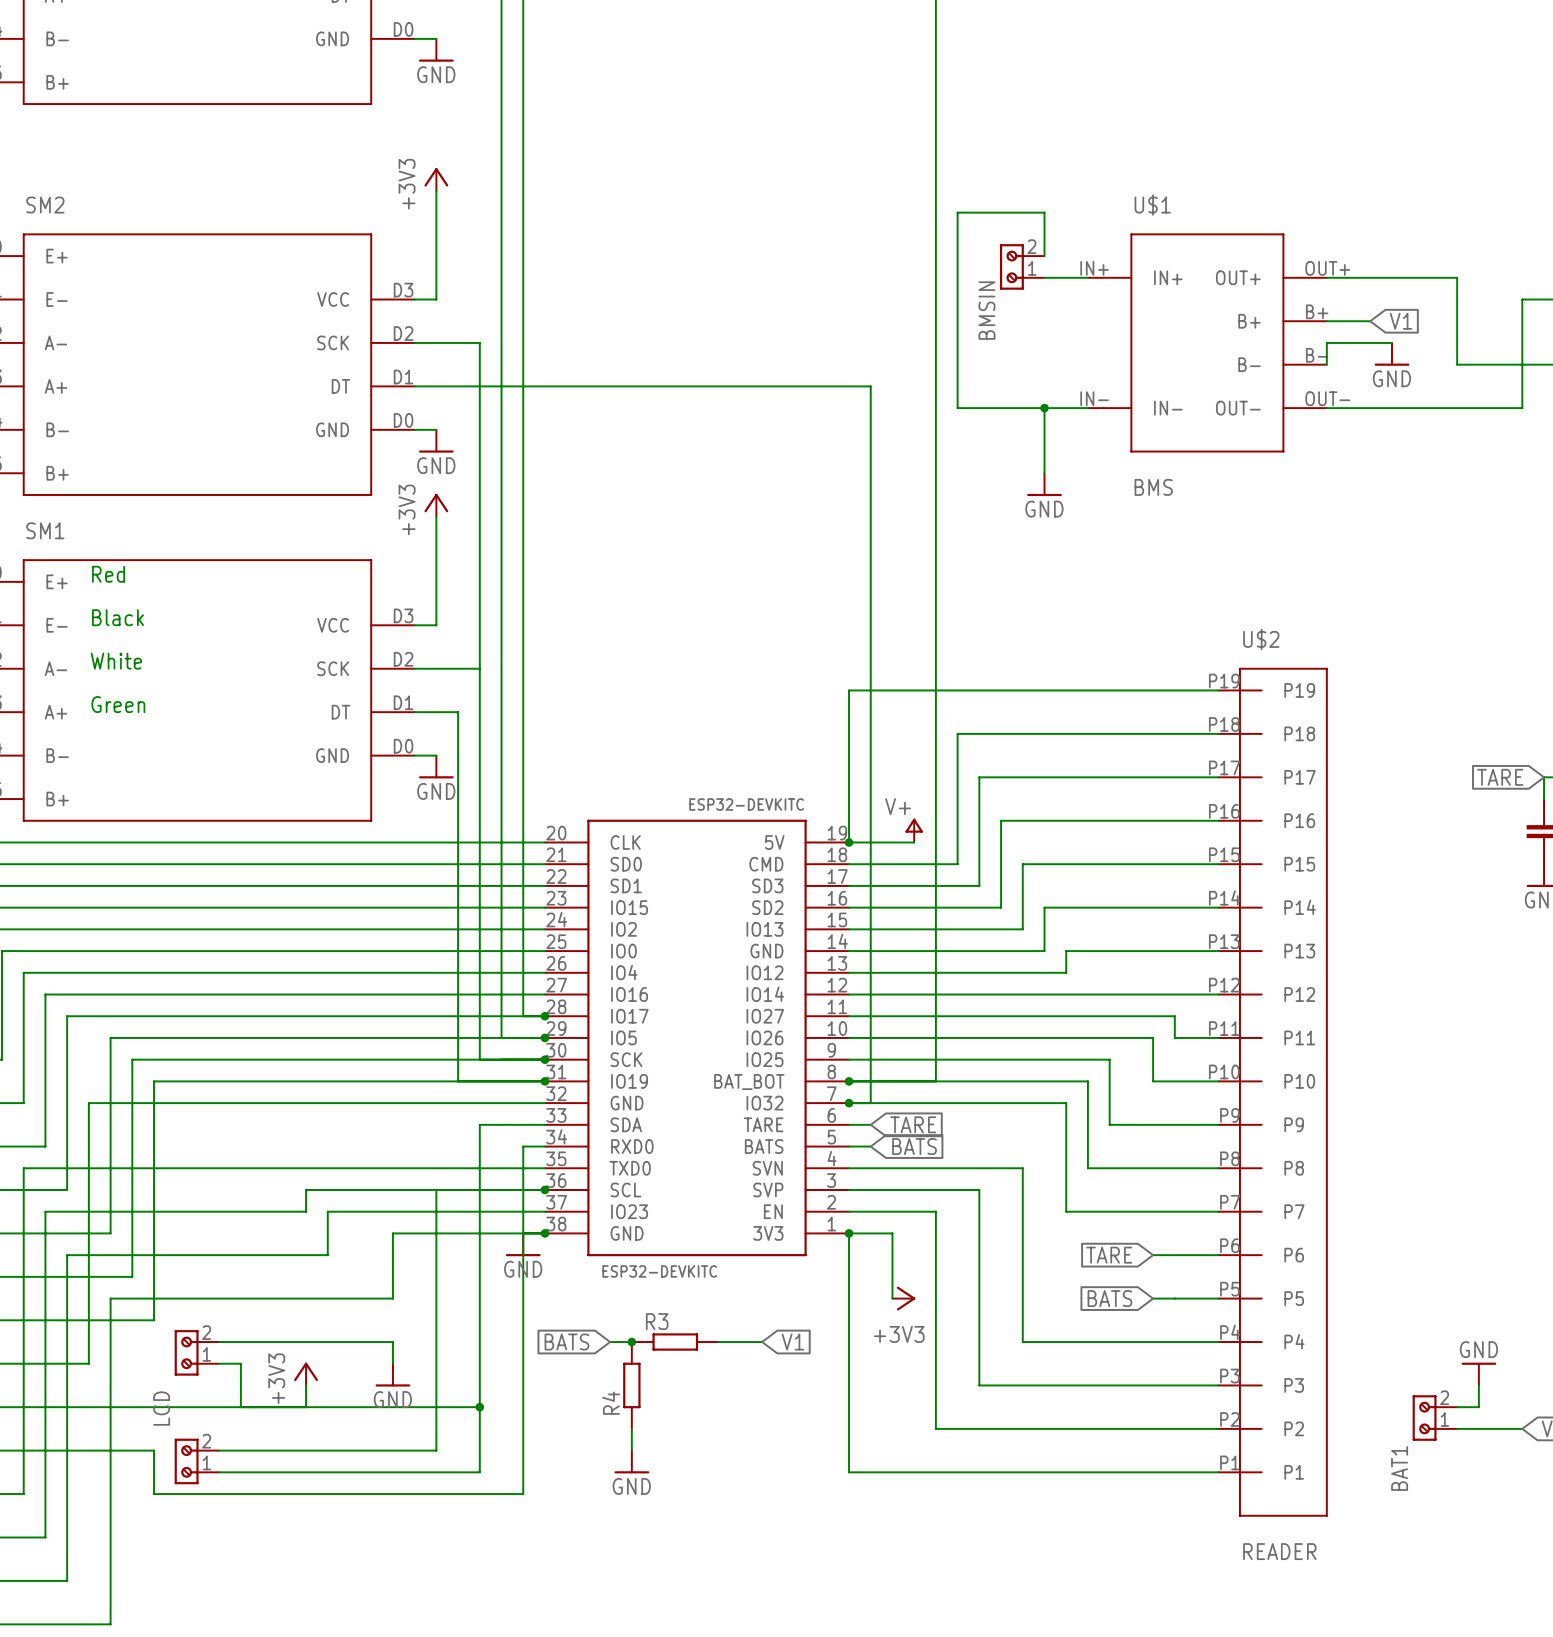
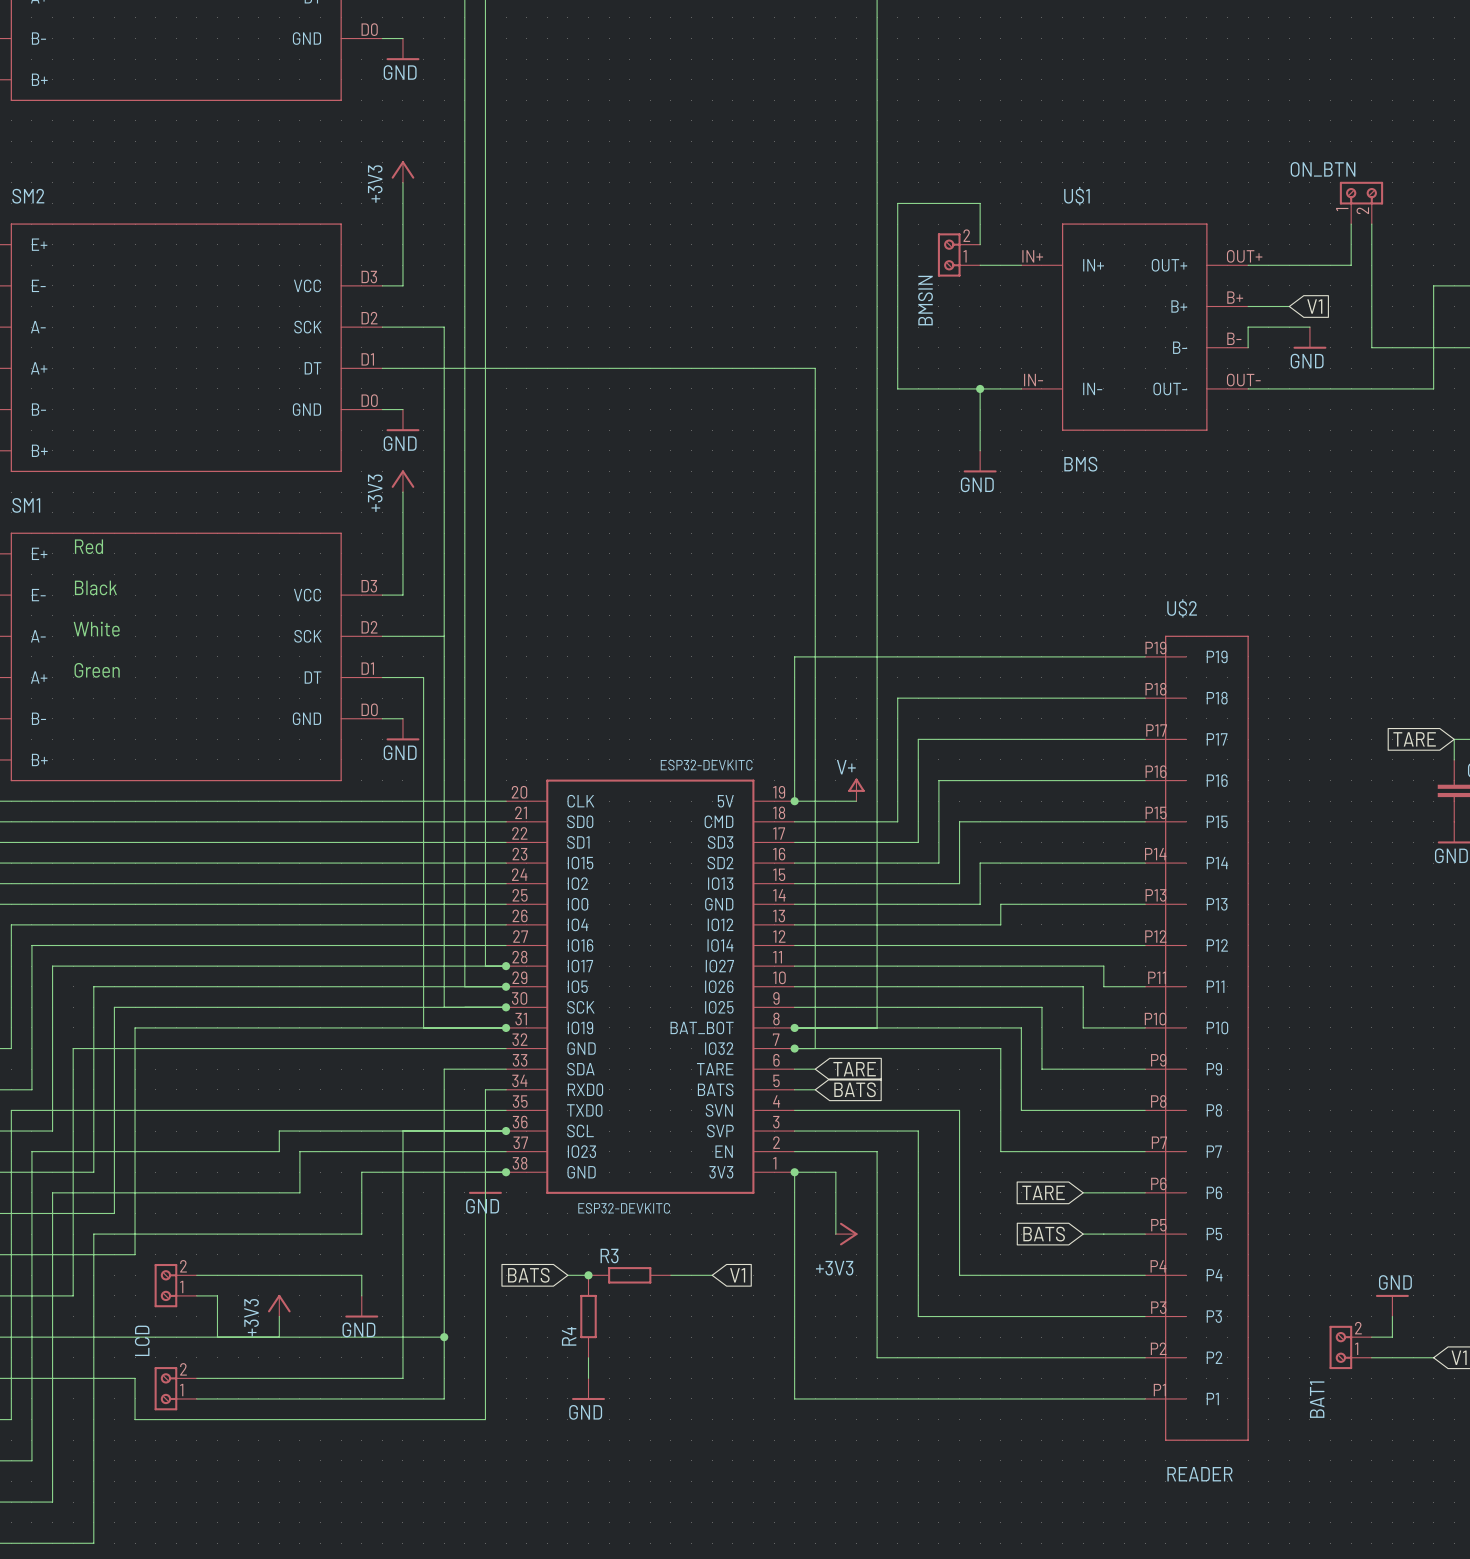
ON_BTN: none -> (1361, 202)
wire: none -> (1371, 224) (1371, 265)
wire: (1435, 277) (1457, 277) -> (1351, 265) (1351, 224)

